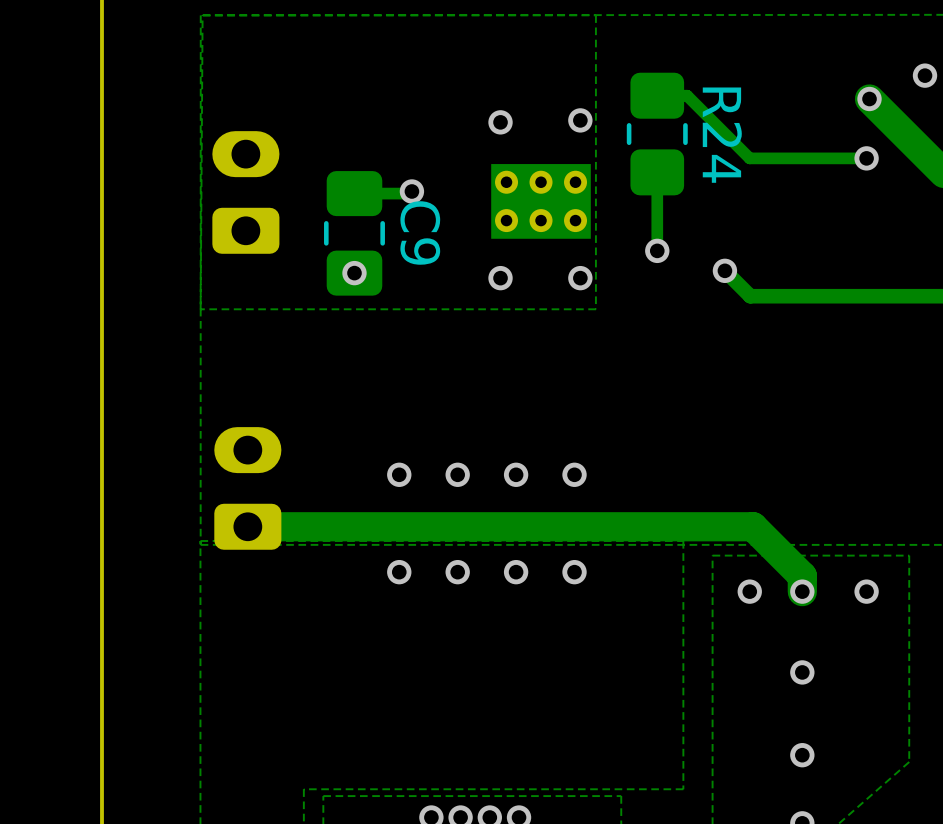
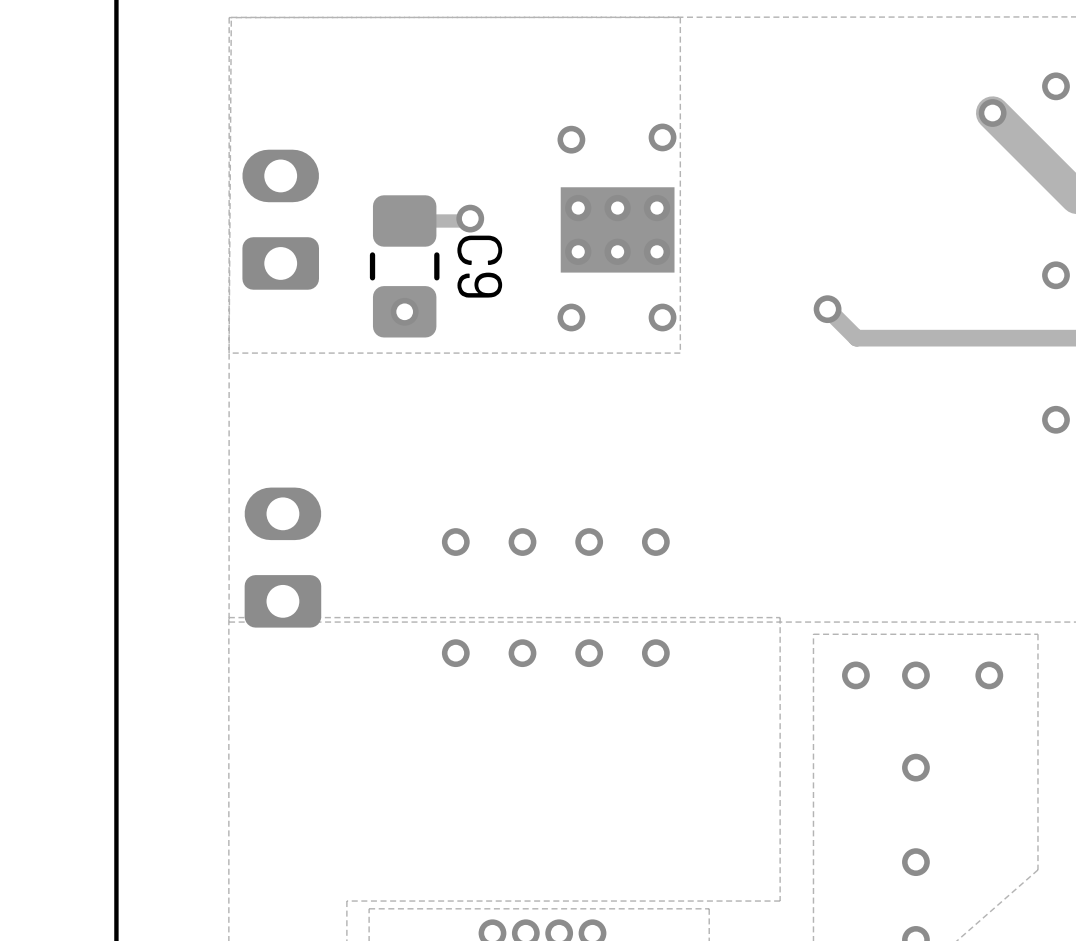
track: (657, 95) (687, 95) (749, 158) (866, 158) -> none
R24: (657, 134) -> none
via: (866, 158) -> none
track: (657, 172) (657, 250) -> none
via: none -> (1055, 275)
via: (657, 250) -> none
via: none -> (1055, 419)
track: (247, 526) (753, 526) (802, 576) (802, 591) -> none

